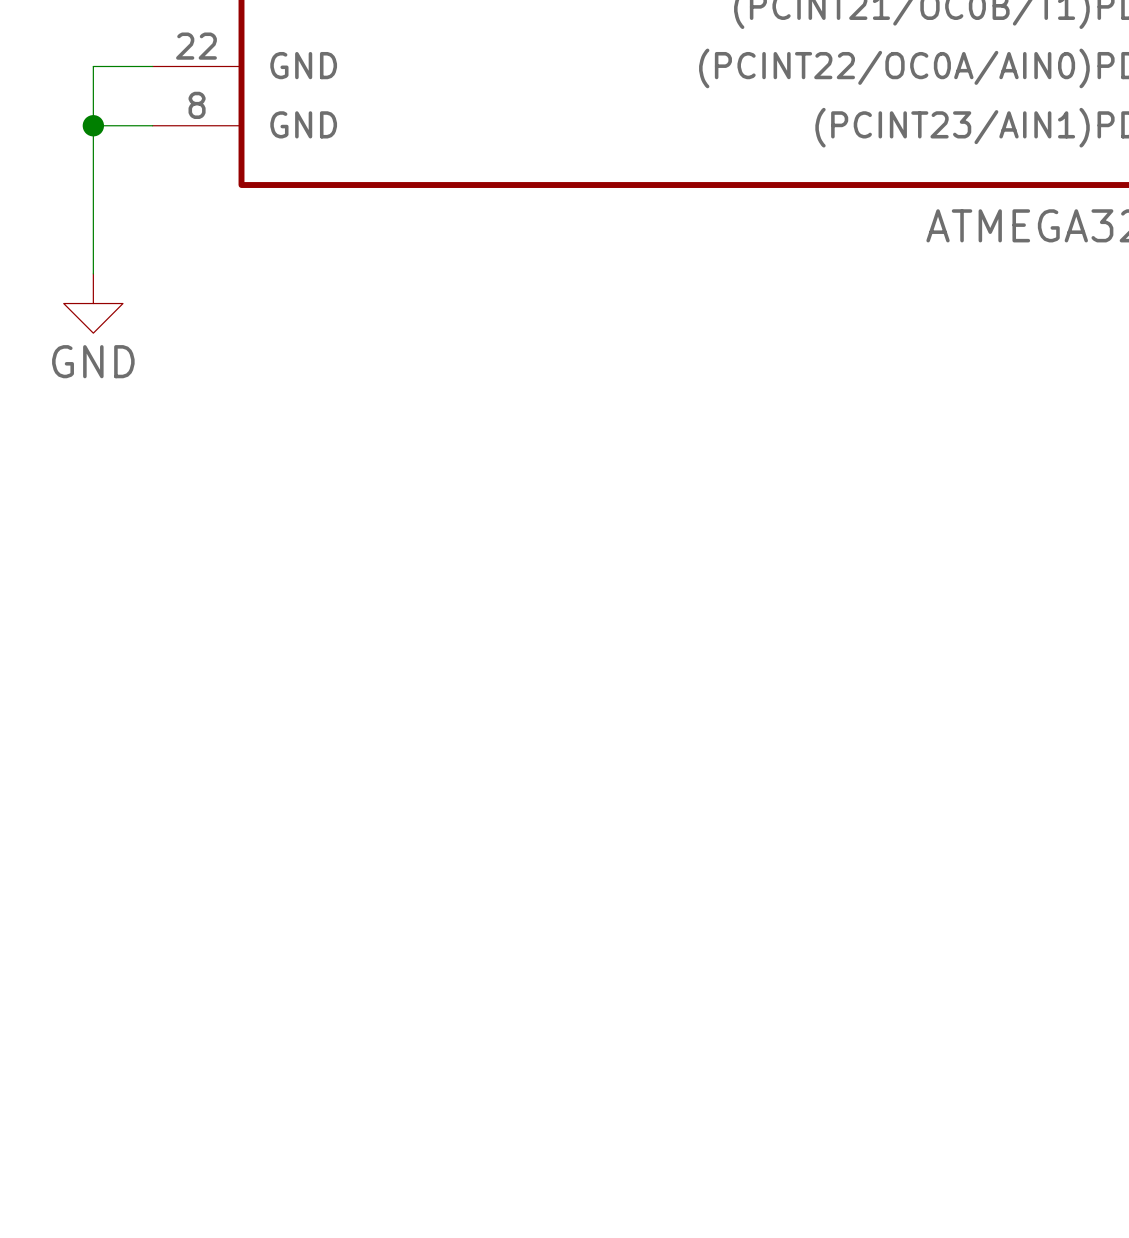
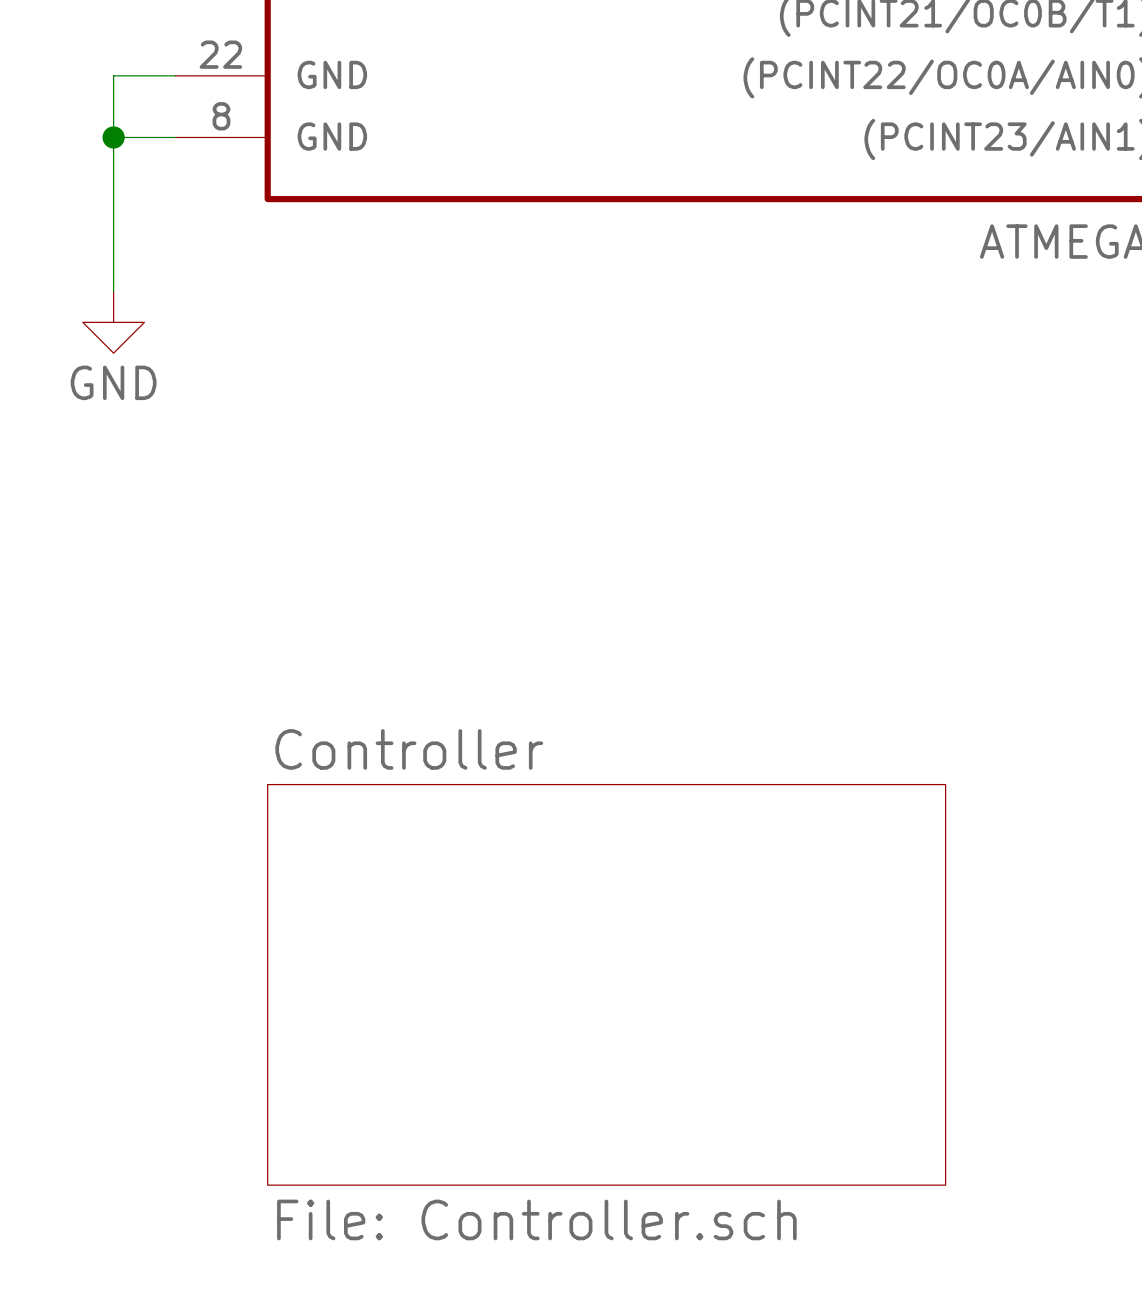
sheet Controller: none -> File: Controller.sch (606, 984)

